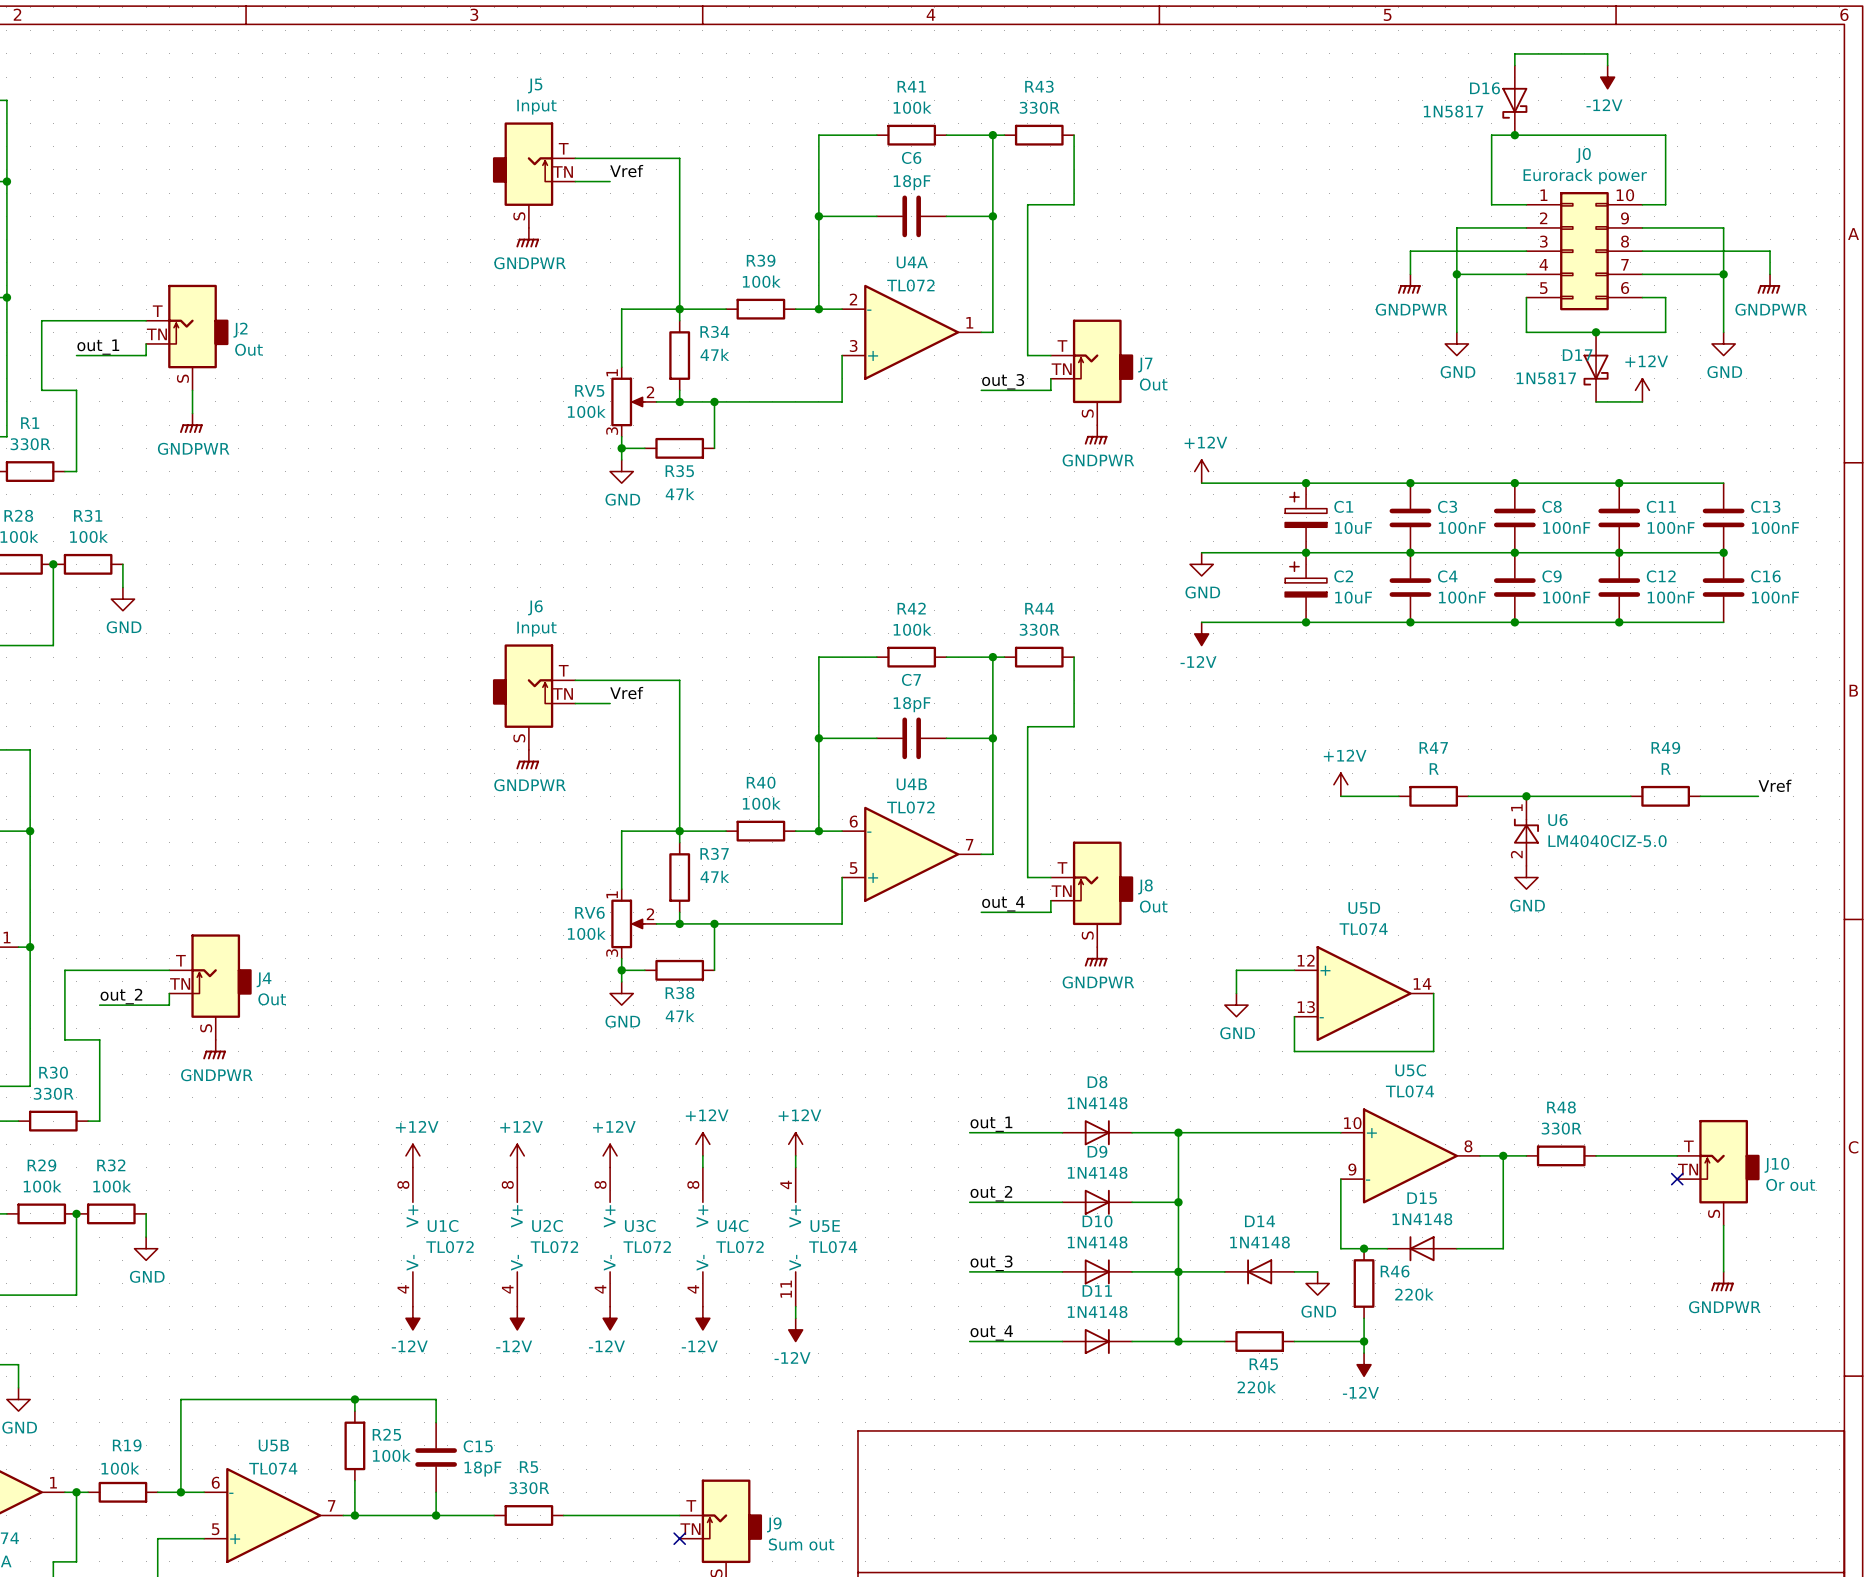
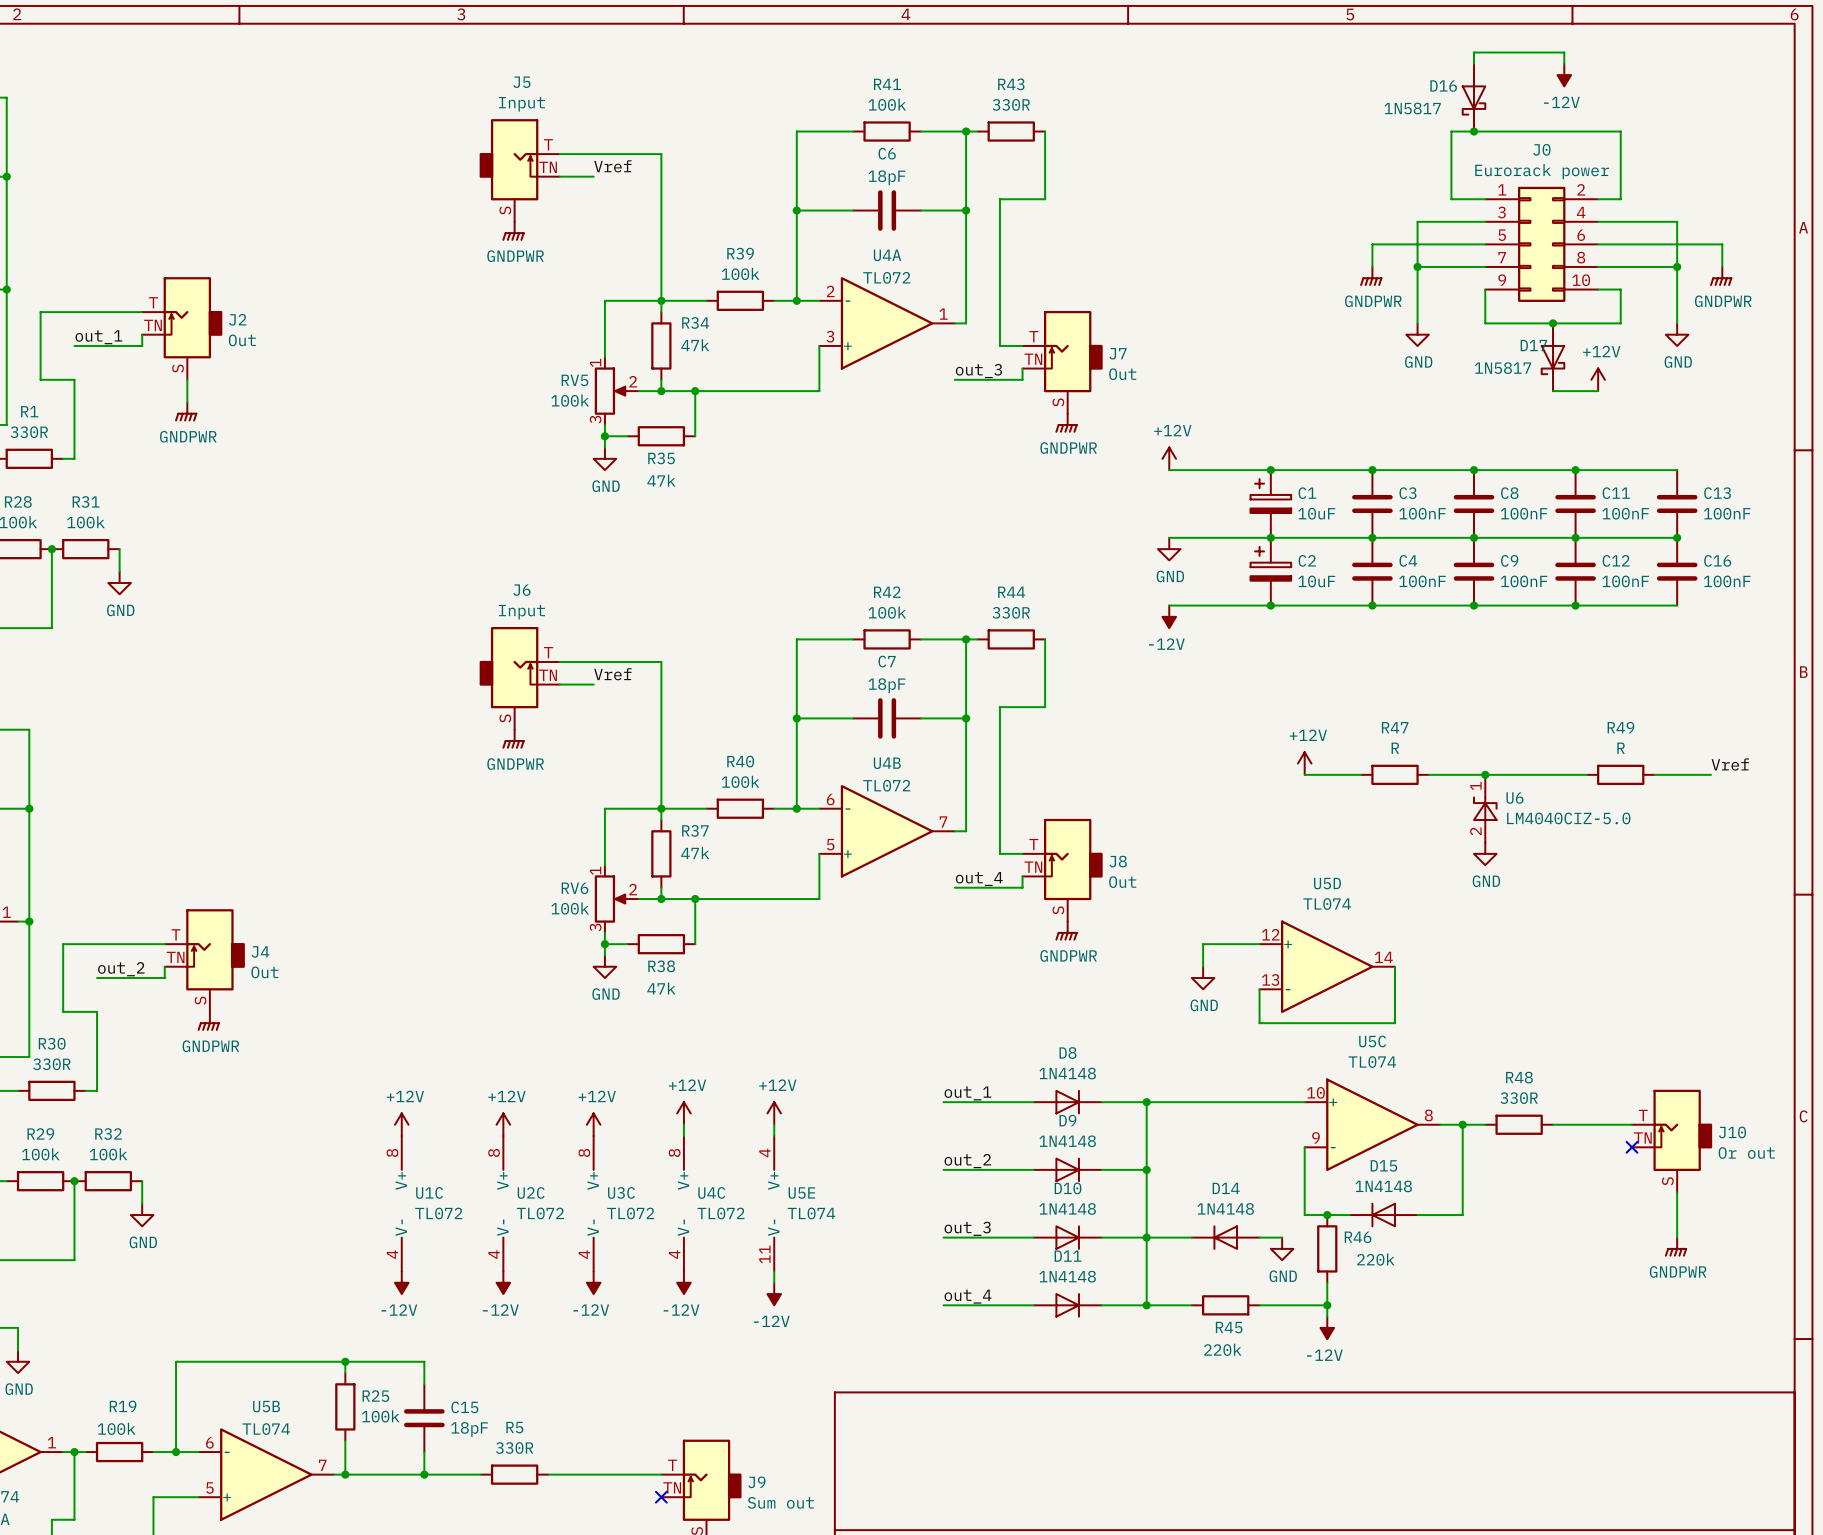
J0 symbol: [1526, 192, 1643, 311] -> [1485, 186, 1599, 302]

